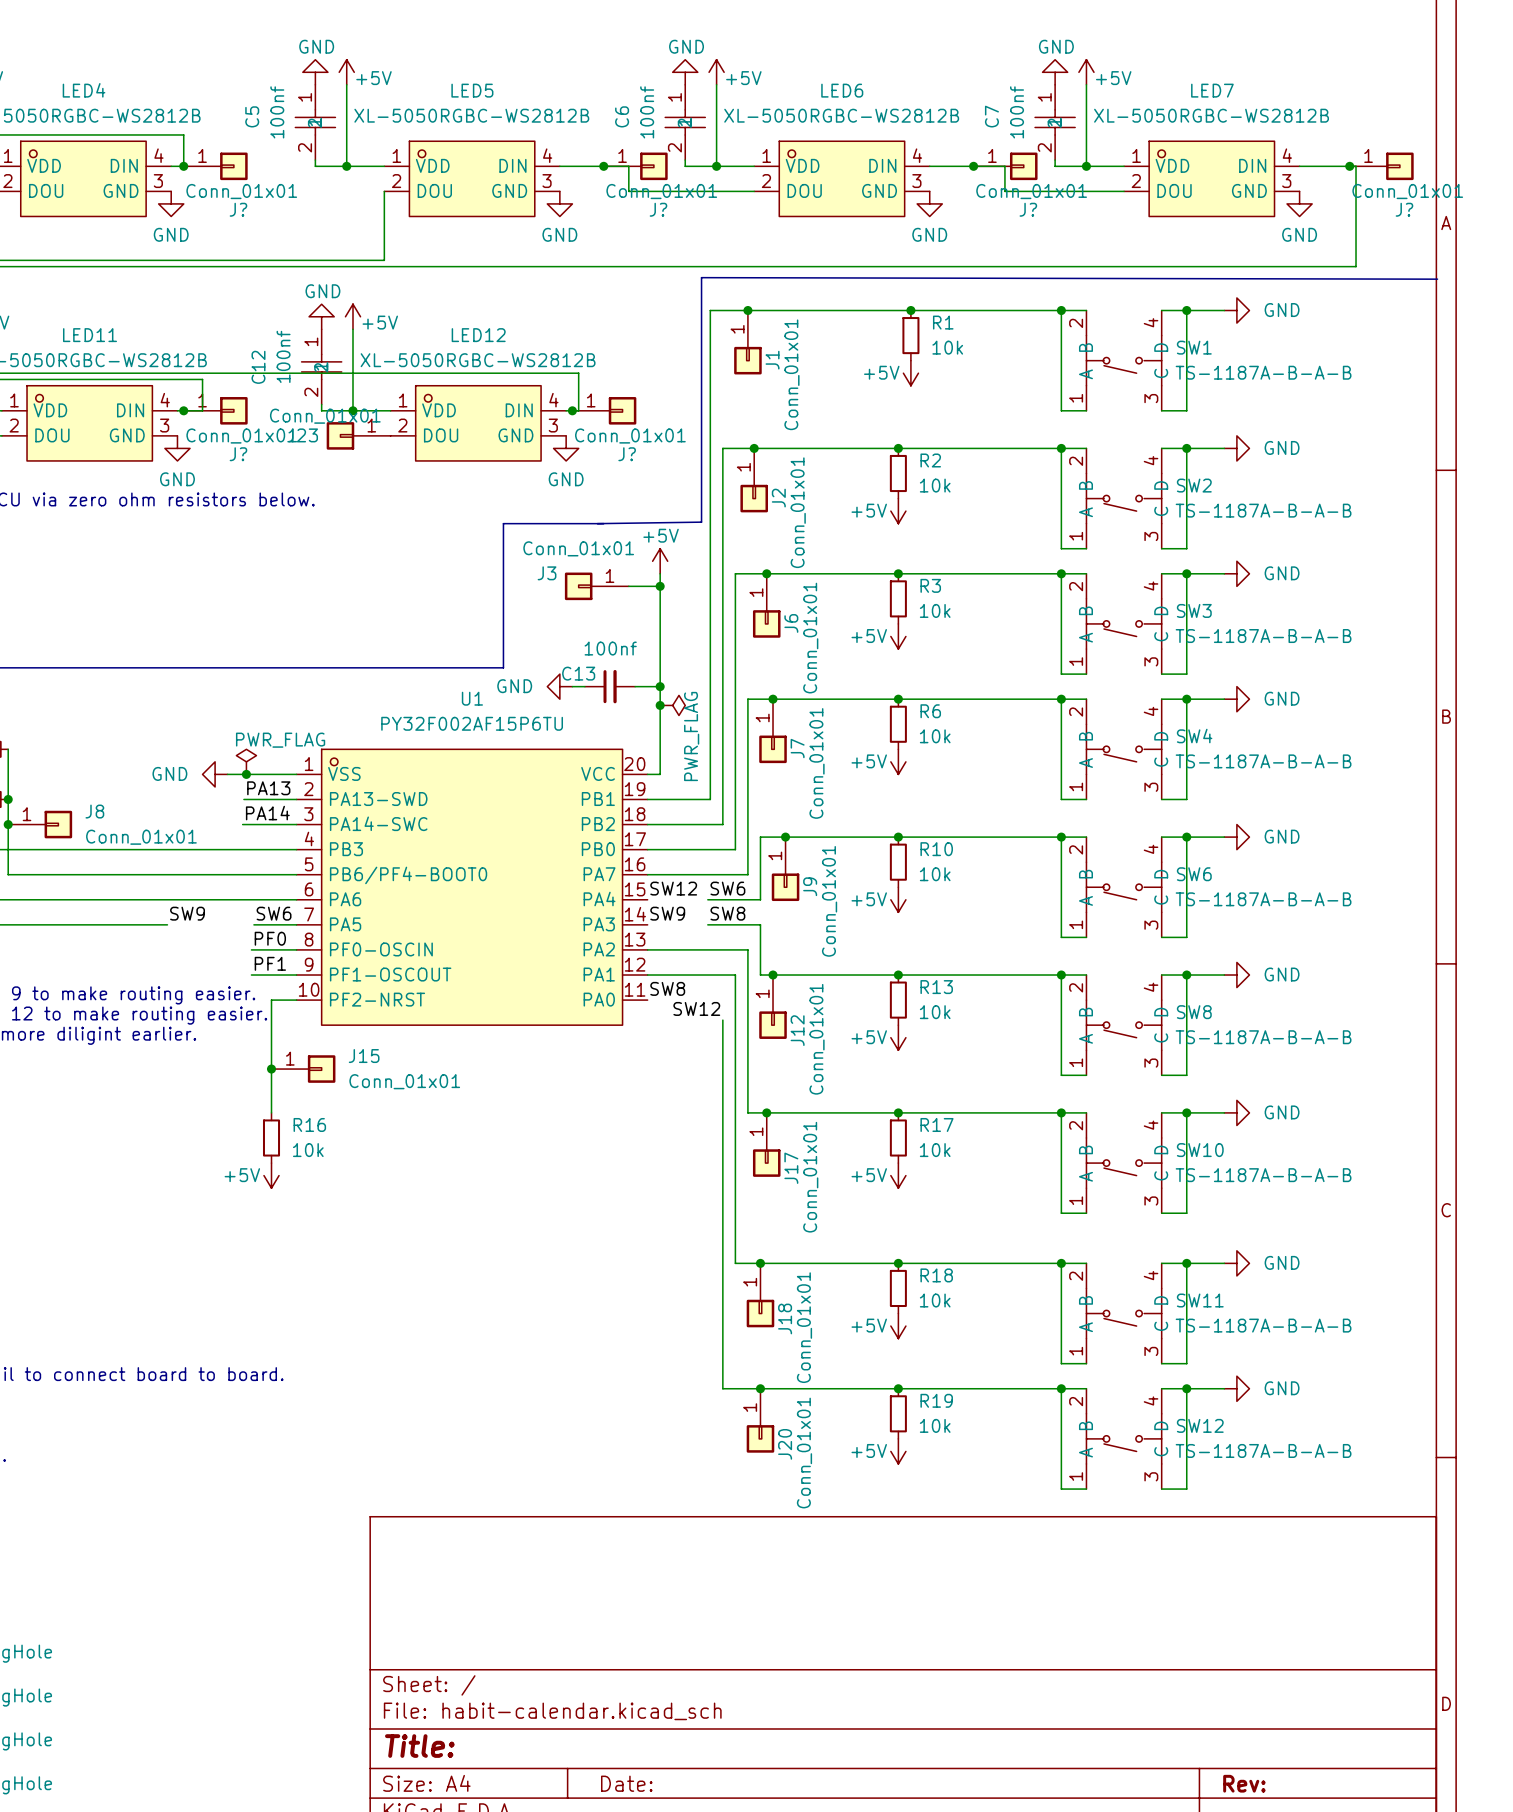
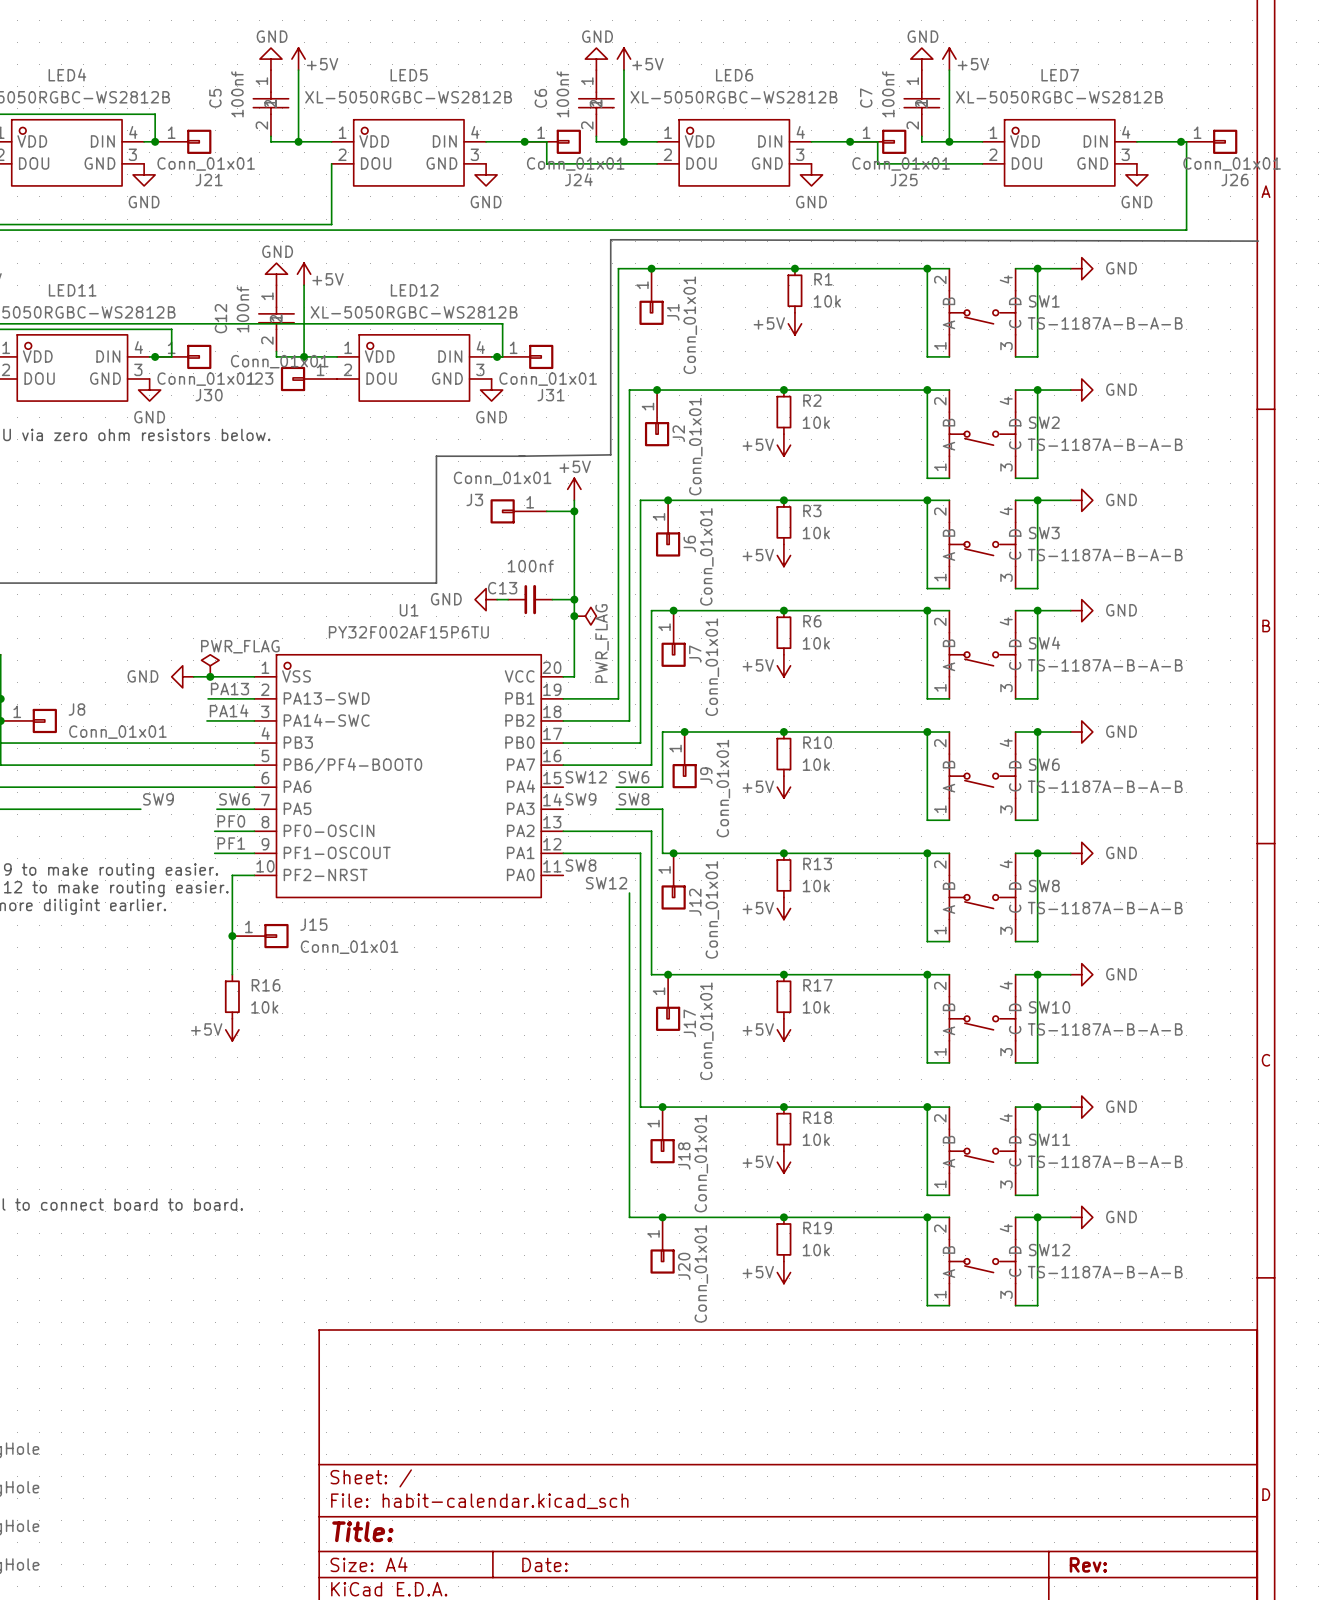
J? name: J? (238, 209) -> J21 (209, 180)
J? name: J? (658, 209) -> J24 (578, 179)
J? name: J? (1028, 209) -> J25 (904, 180)
J? name: J? (1404, 209) -> J26 (1234, 180)
J? name: J? (238, 454) -> J30 (209, 395)
J? name: J? (627, 454) -> J31 (551, 395)

